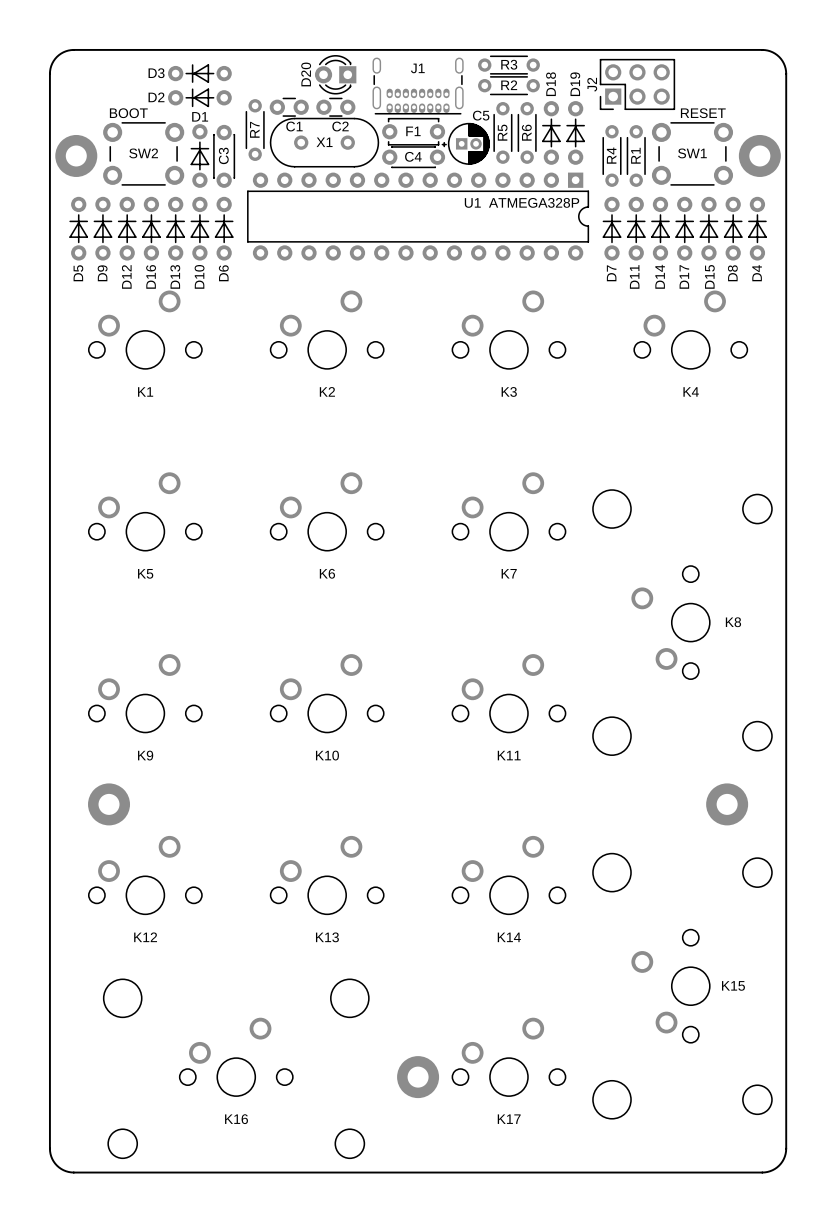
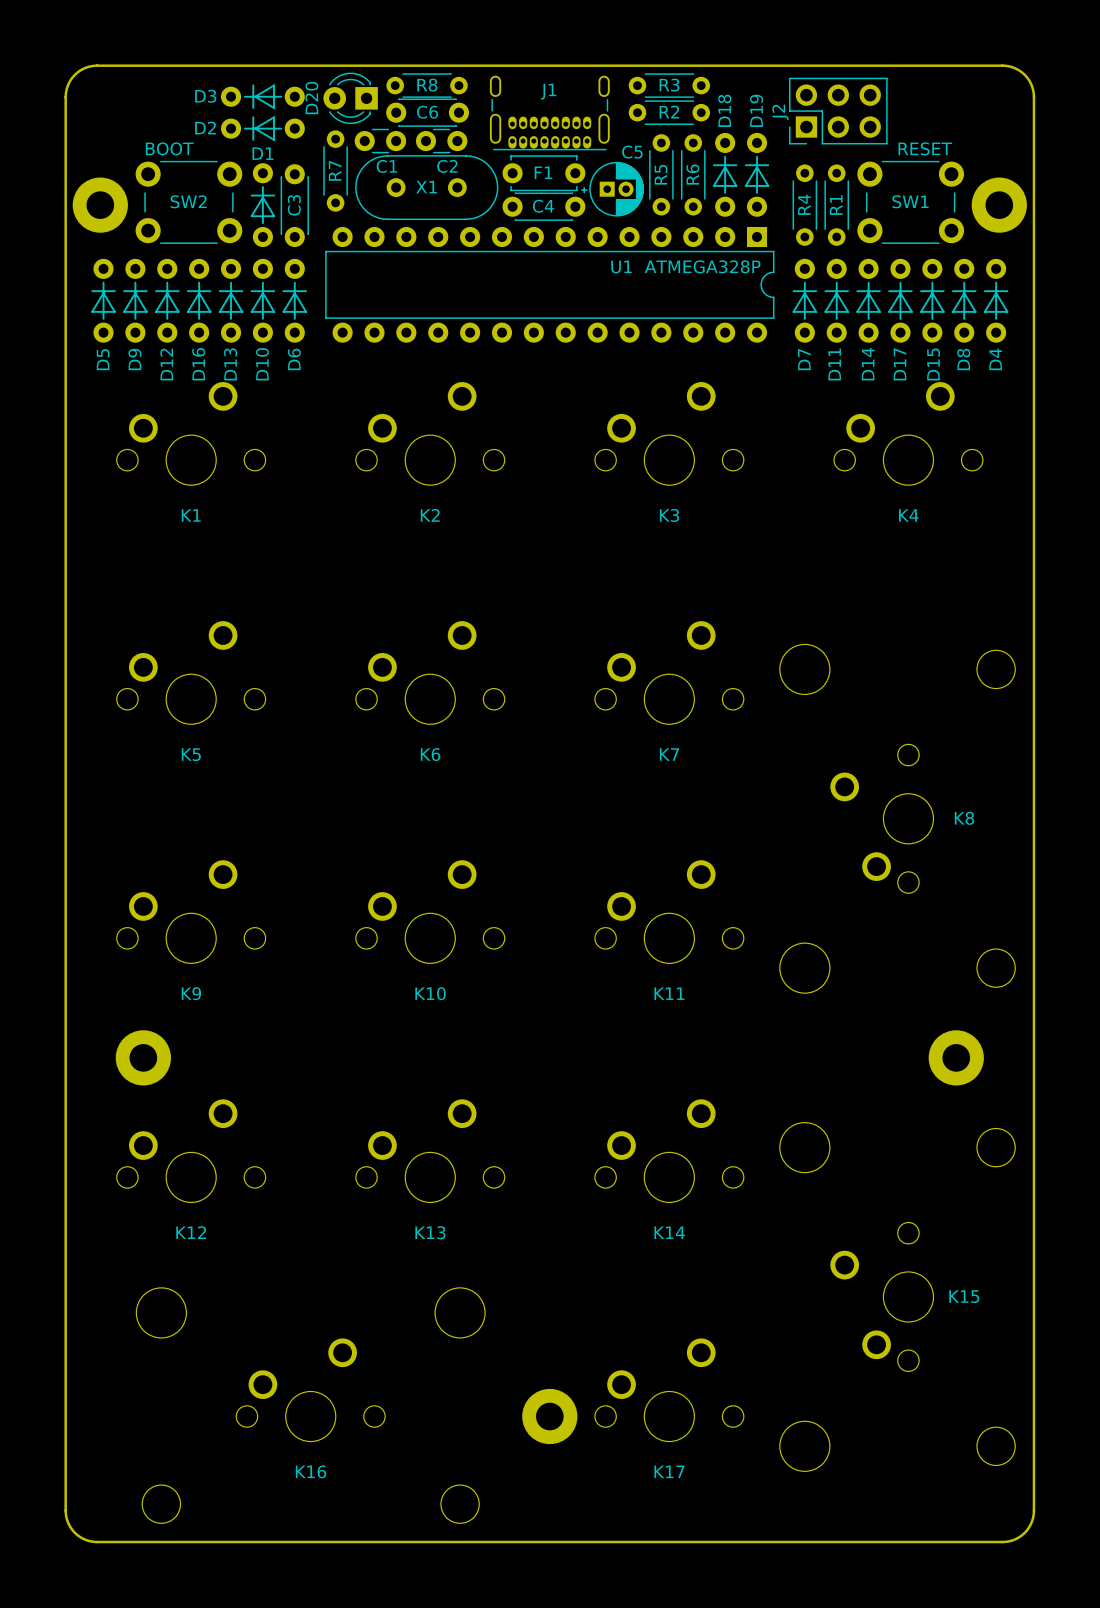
R8: none -> (427, 85)
D20 position: (335, 74) -> (350, 98)
C6: none -> (427, 112)

